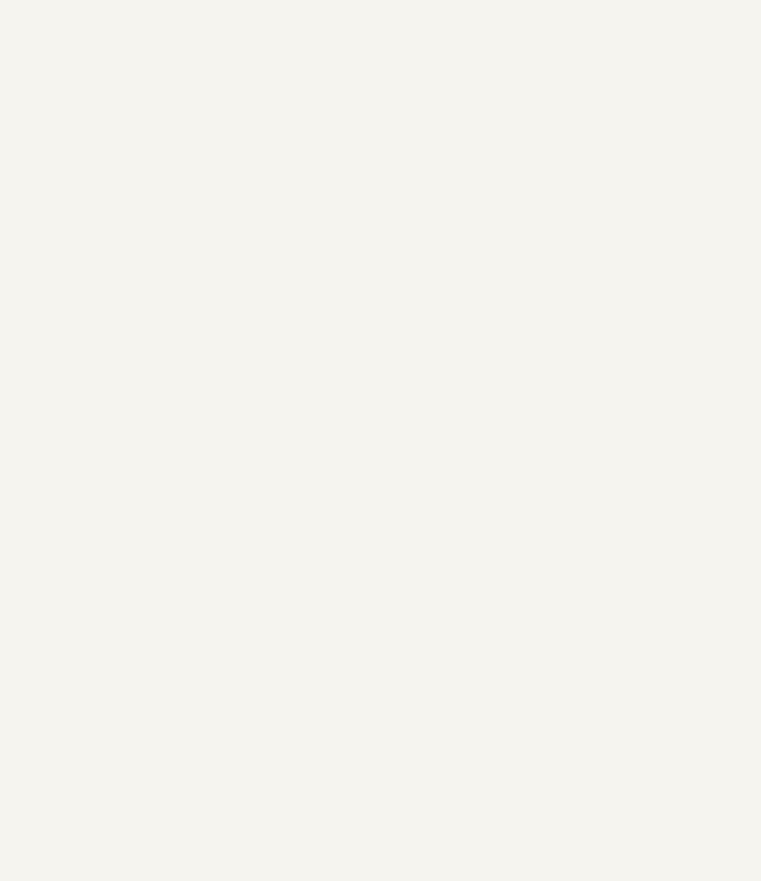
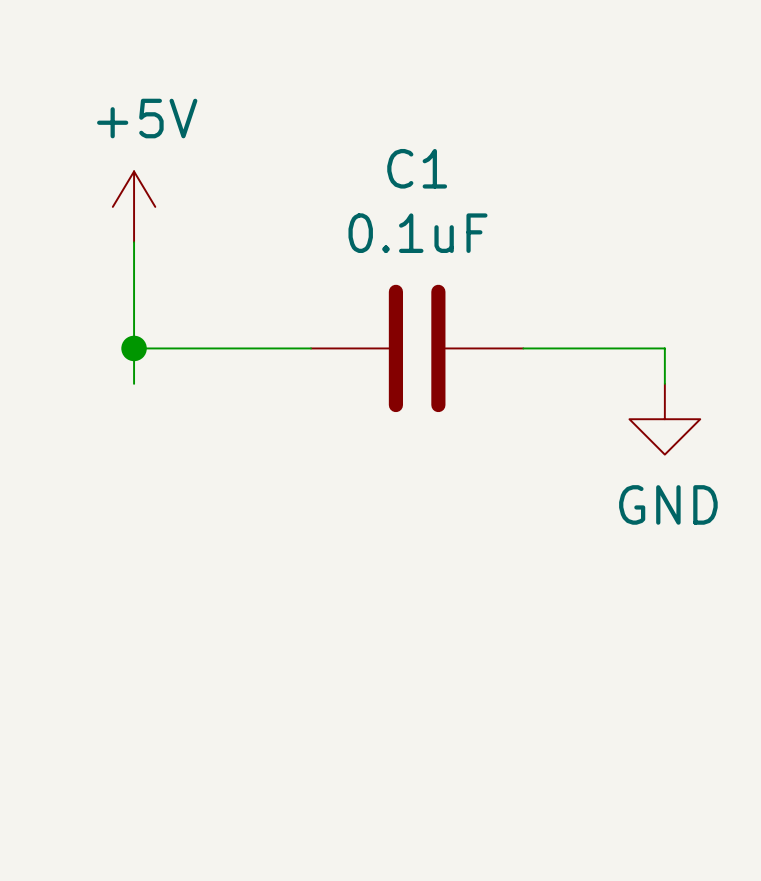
power symbol: none -> +5V (134, 206)
wire: none -> (134, 242) (134, 383)
wire: none -> (134, 348) (310, 348)
junction: none -> (134, 348)
C1: none -> 0.1uF (417, 348)
wire: none -> (523, 348) (664, 348) (664, 383)
power symbol: none -> GND (664, 419)

